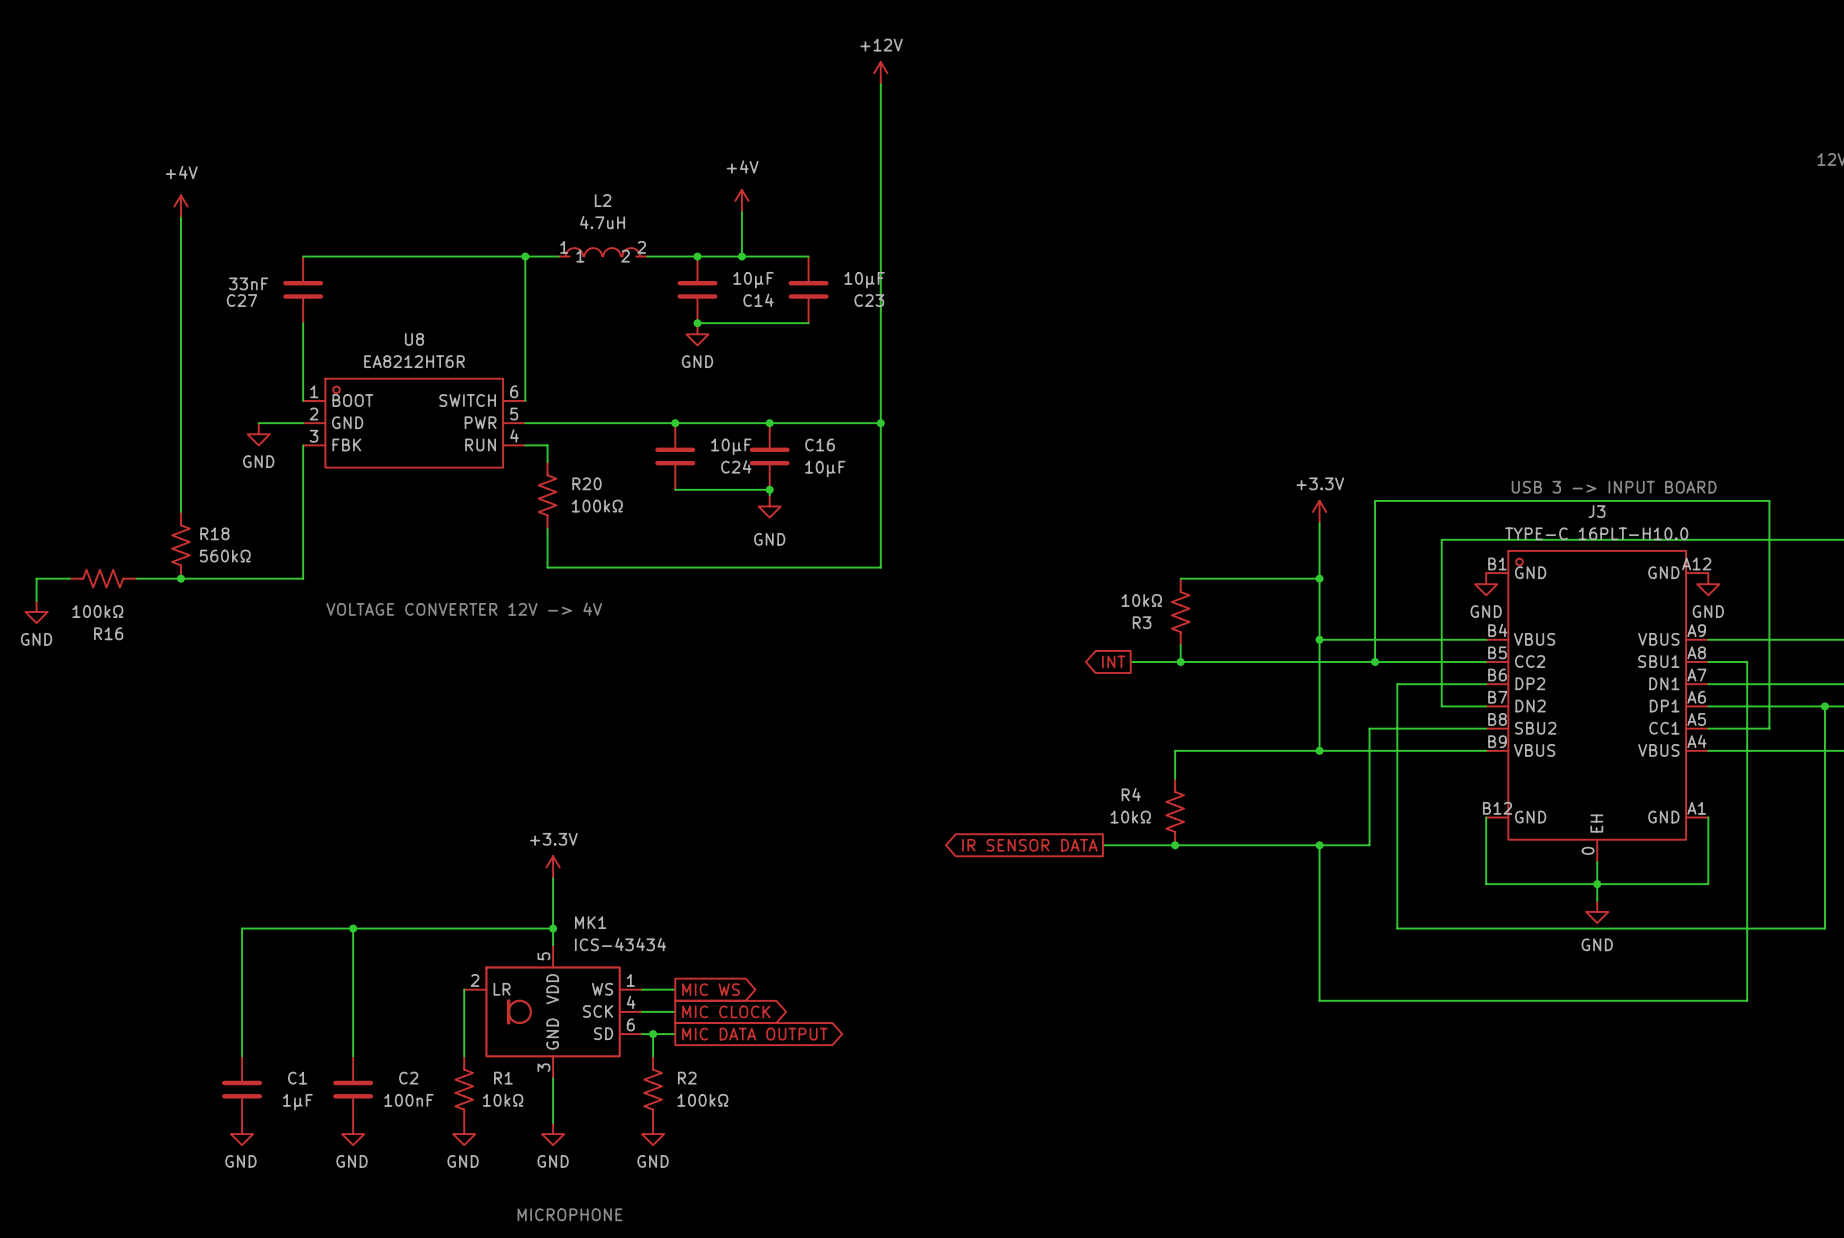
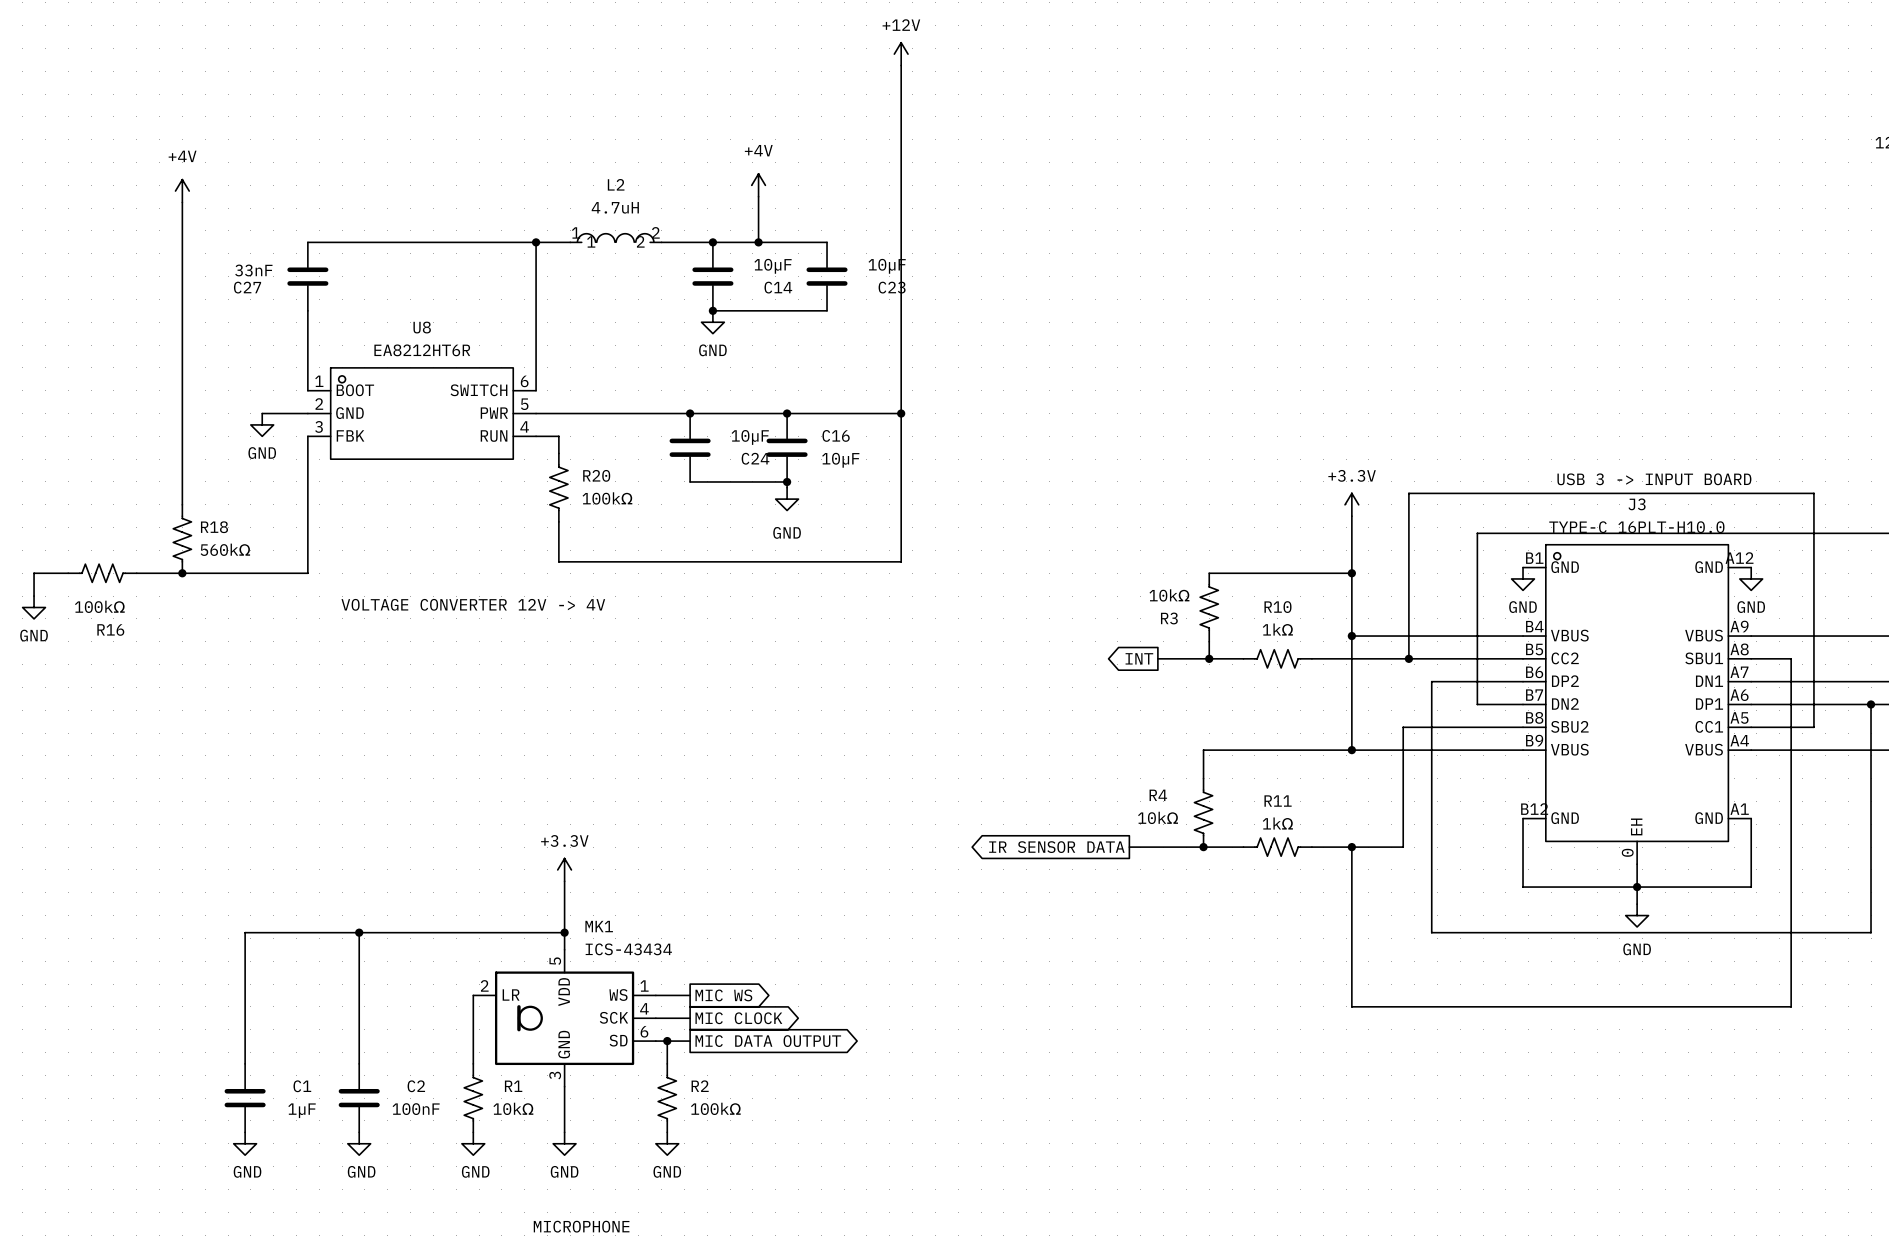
R10: none -> 1kΩ (1277, 658)
R11: none -> 1kΩ (1277, 847)

